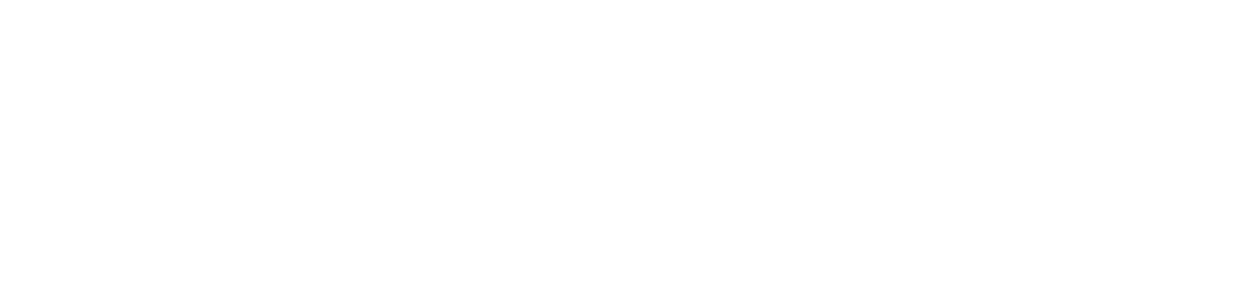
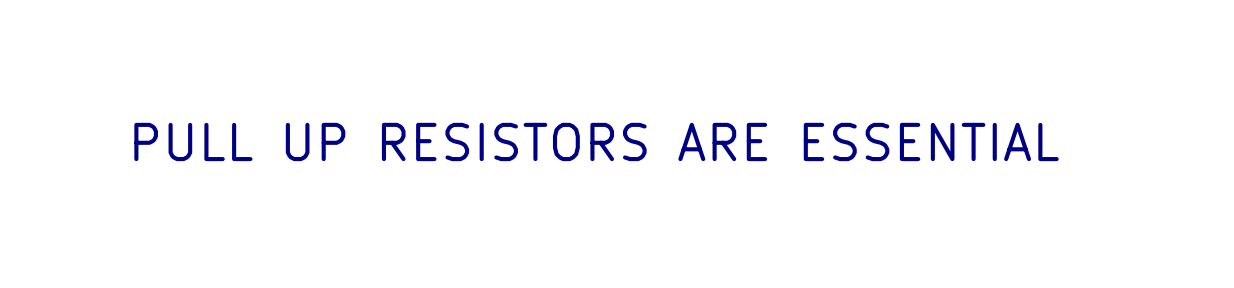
text: none -> PULL UP RESISTORS ARE ESSENTIAL (596, 141)

